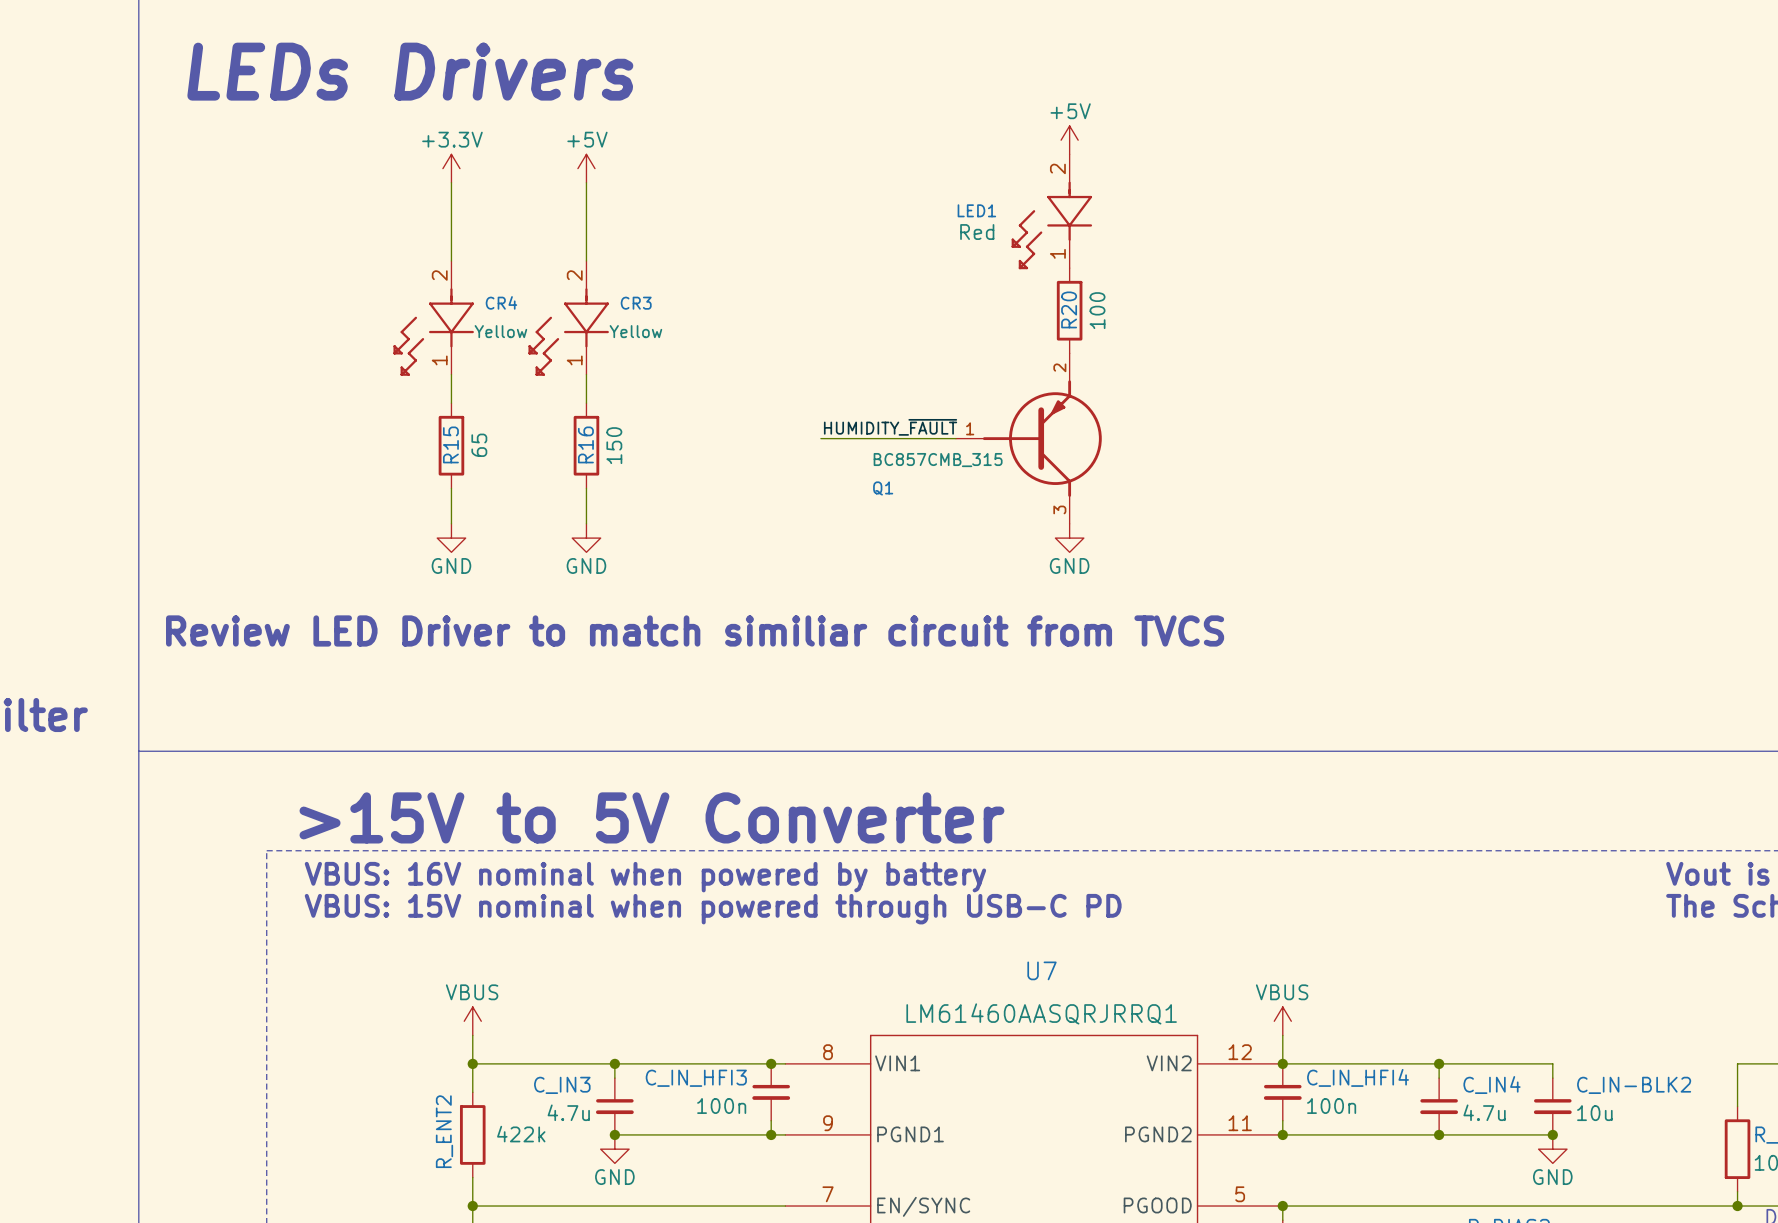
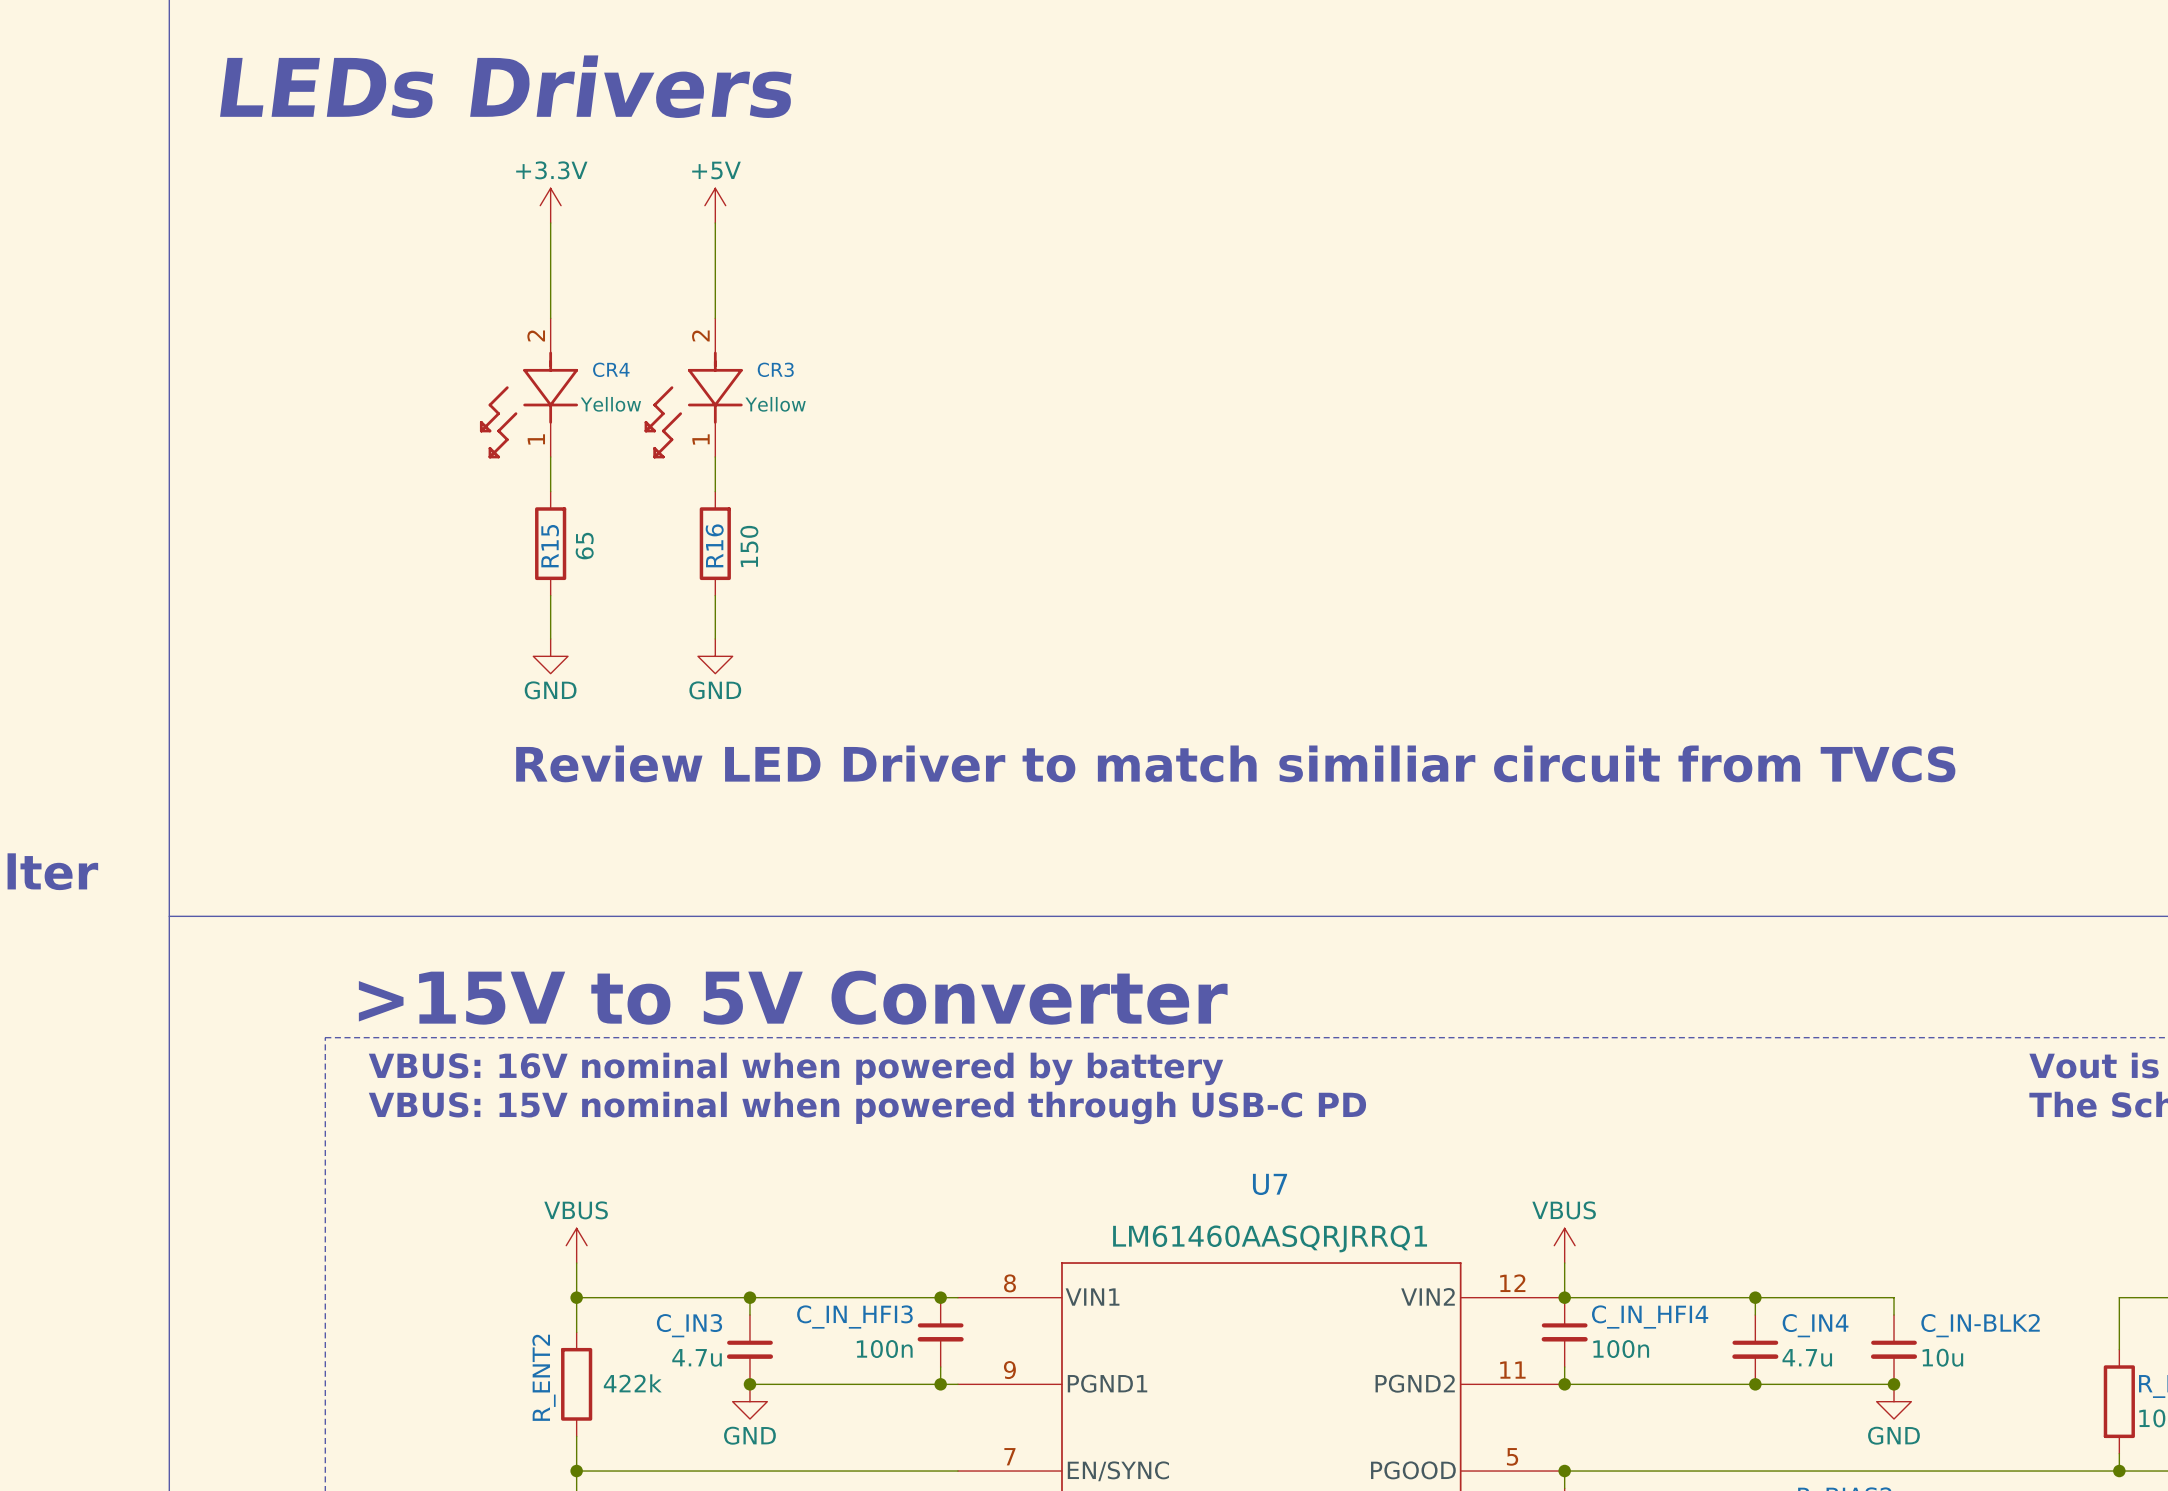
power symbol: +5V (1069, 140) -> none
LED1: (1051, 211) -> none
R20: 100 (1069, 310) -> none
label: HUMIDITY_~{FAULT} (890, 427) -> none
wire: (820, 438) (955, 438) -> none
Q1: BC857CMB_315 (1028, 438) -> none
power symbol: GND (1069, 538) -> none
text: none -> Review LED Driver to match similiar circuit from TVCS (1235, 763)
text: Review LED Driver to match similiar circuit from TVCS (695, 630) -> none

